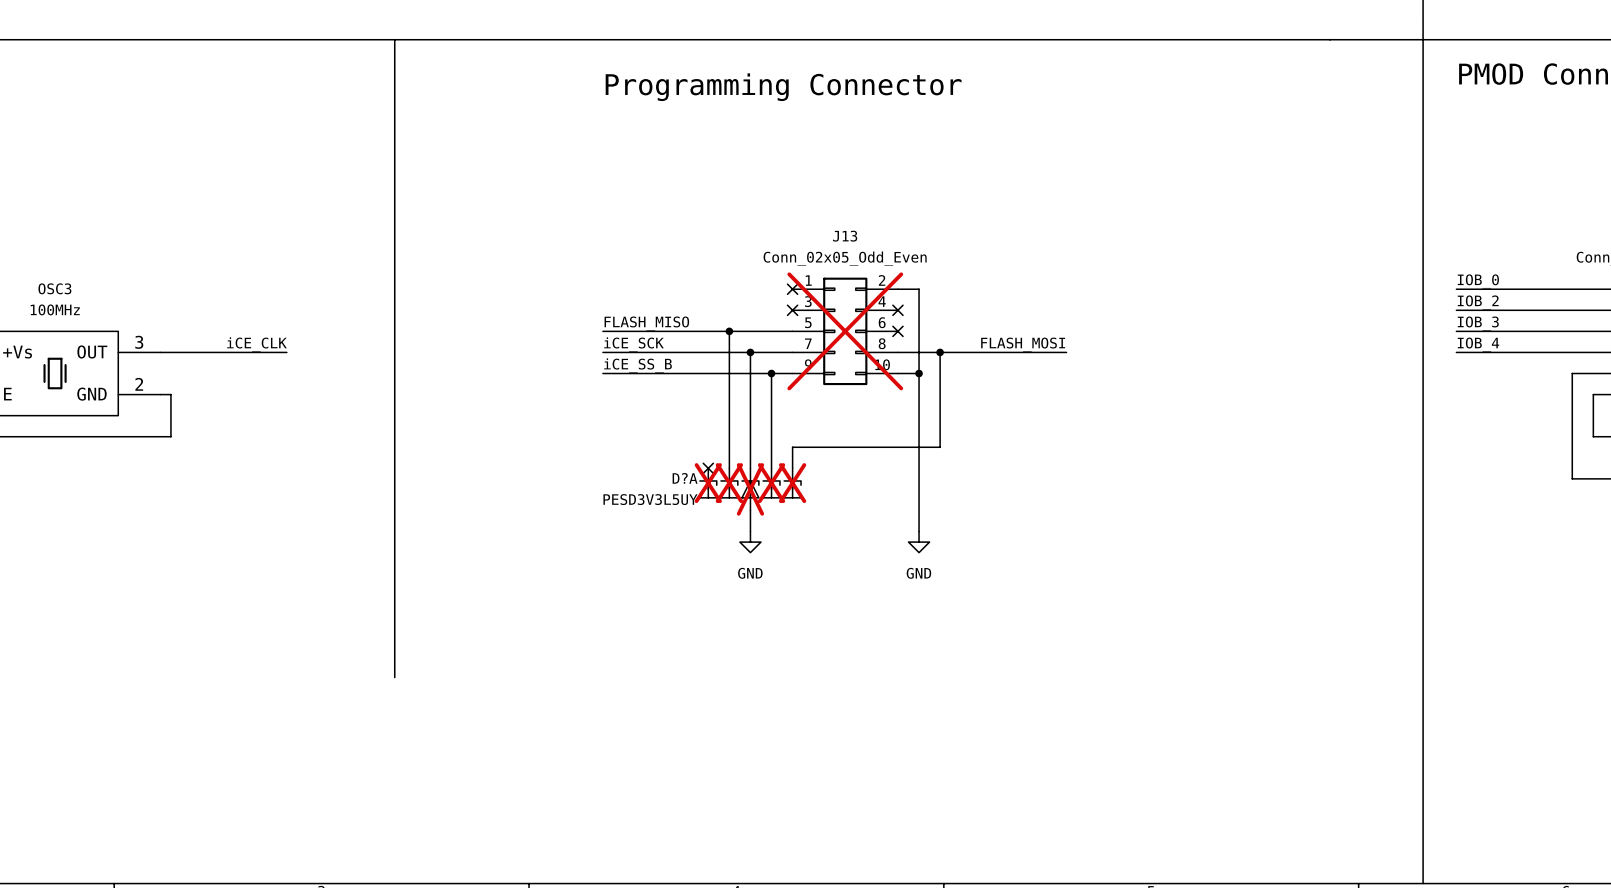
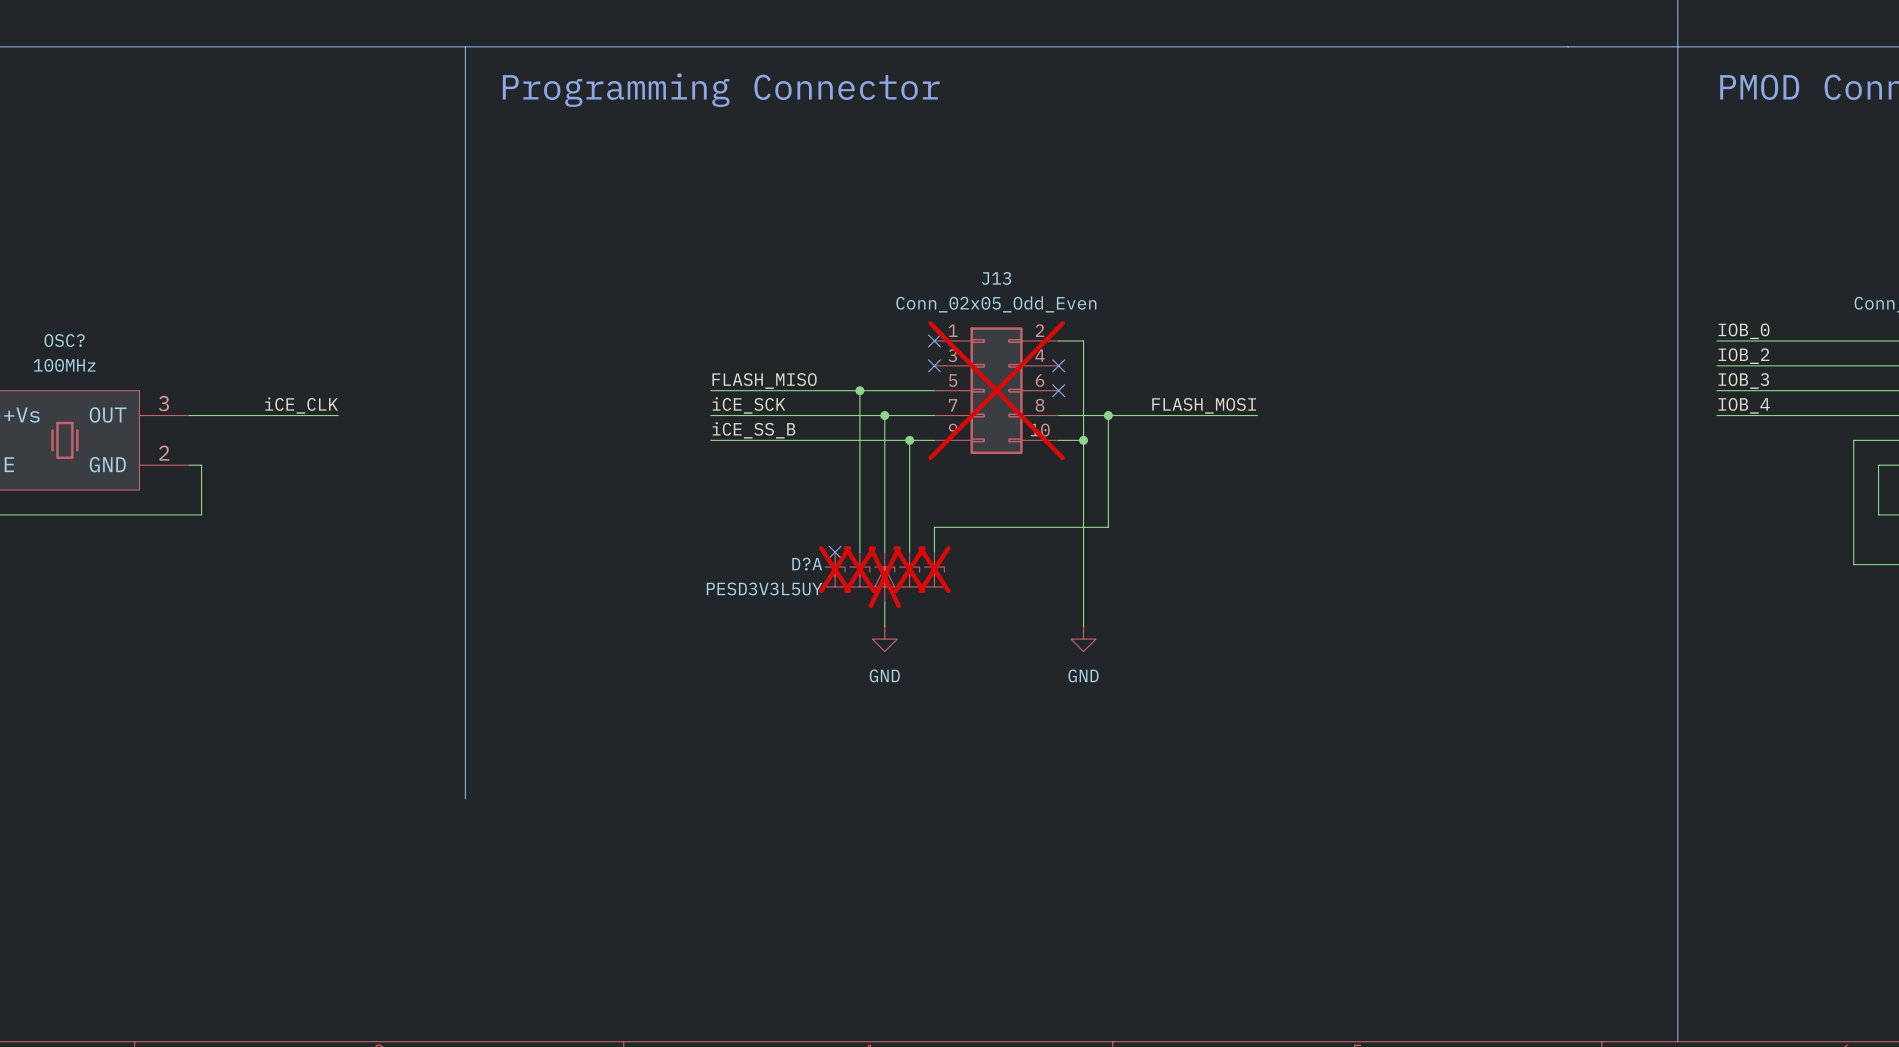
text position: Programming Connector (783, 87) -> Programming Connector (721, 90)
OSC3 name: OSC3 (54, 288) -> OSC? (64, 340)

